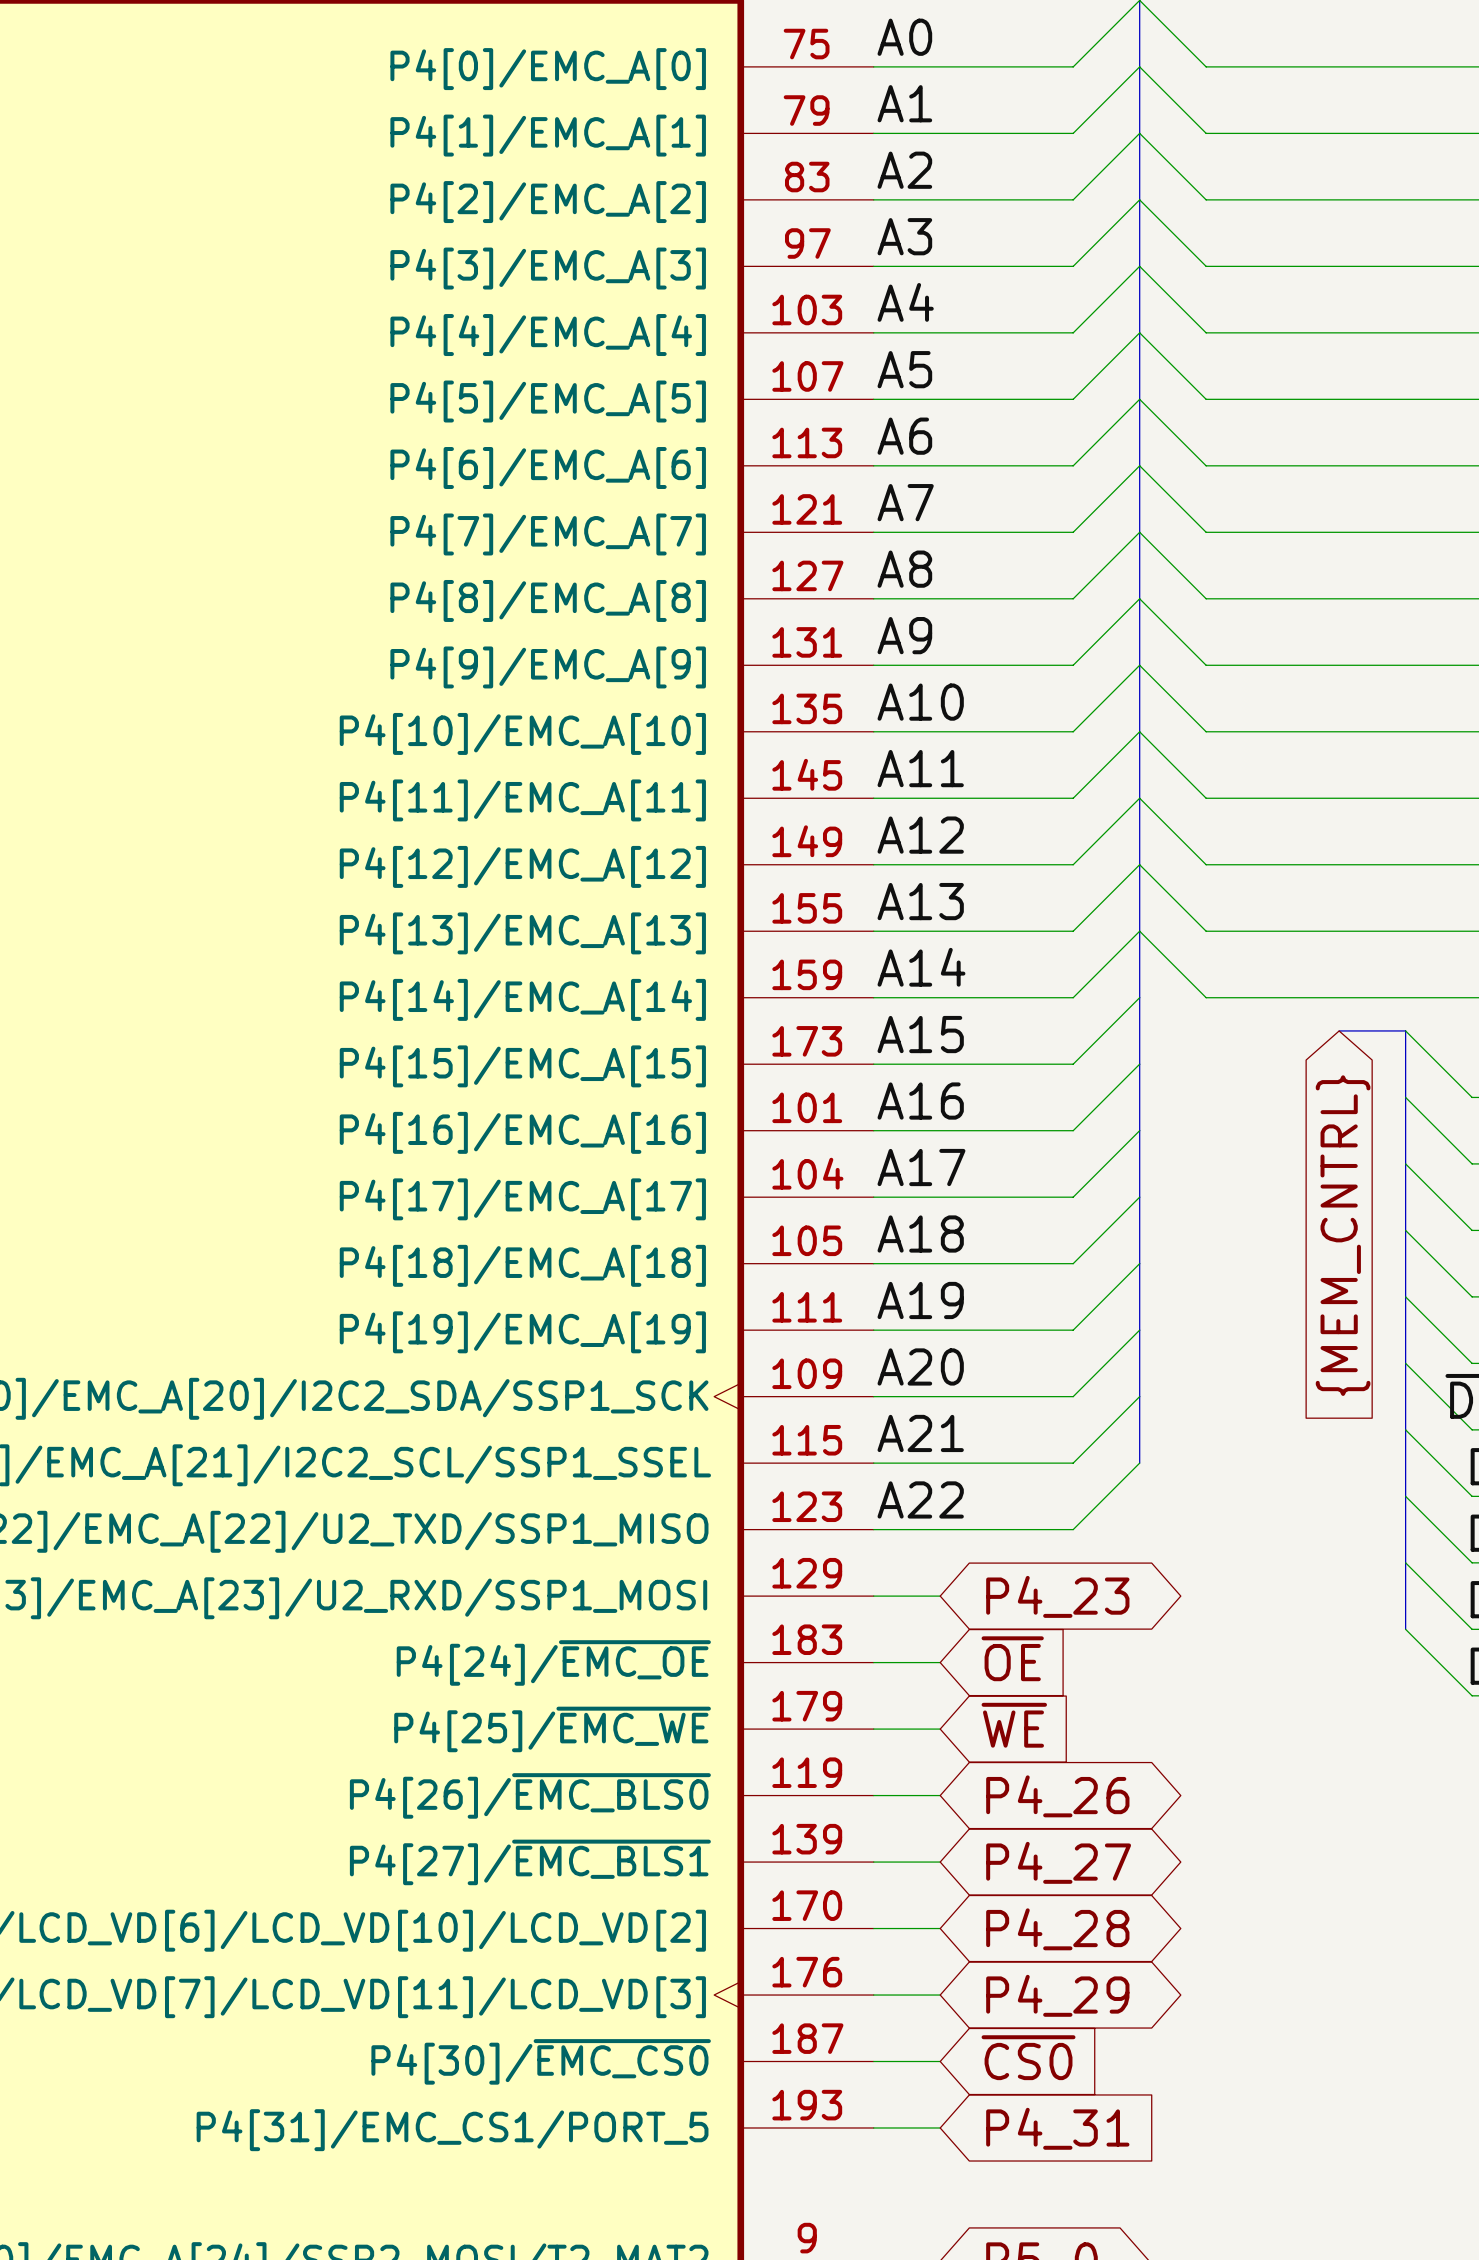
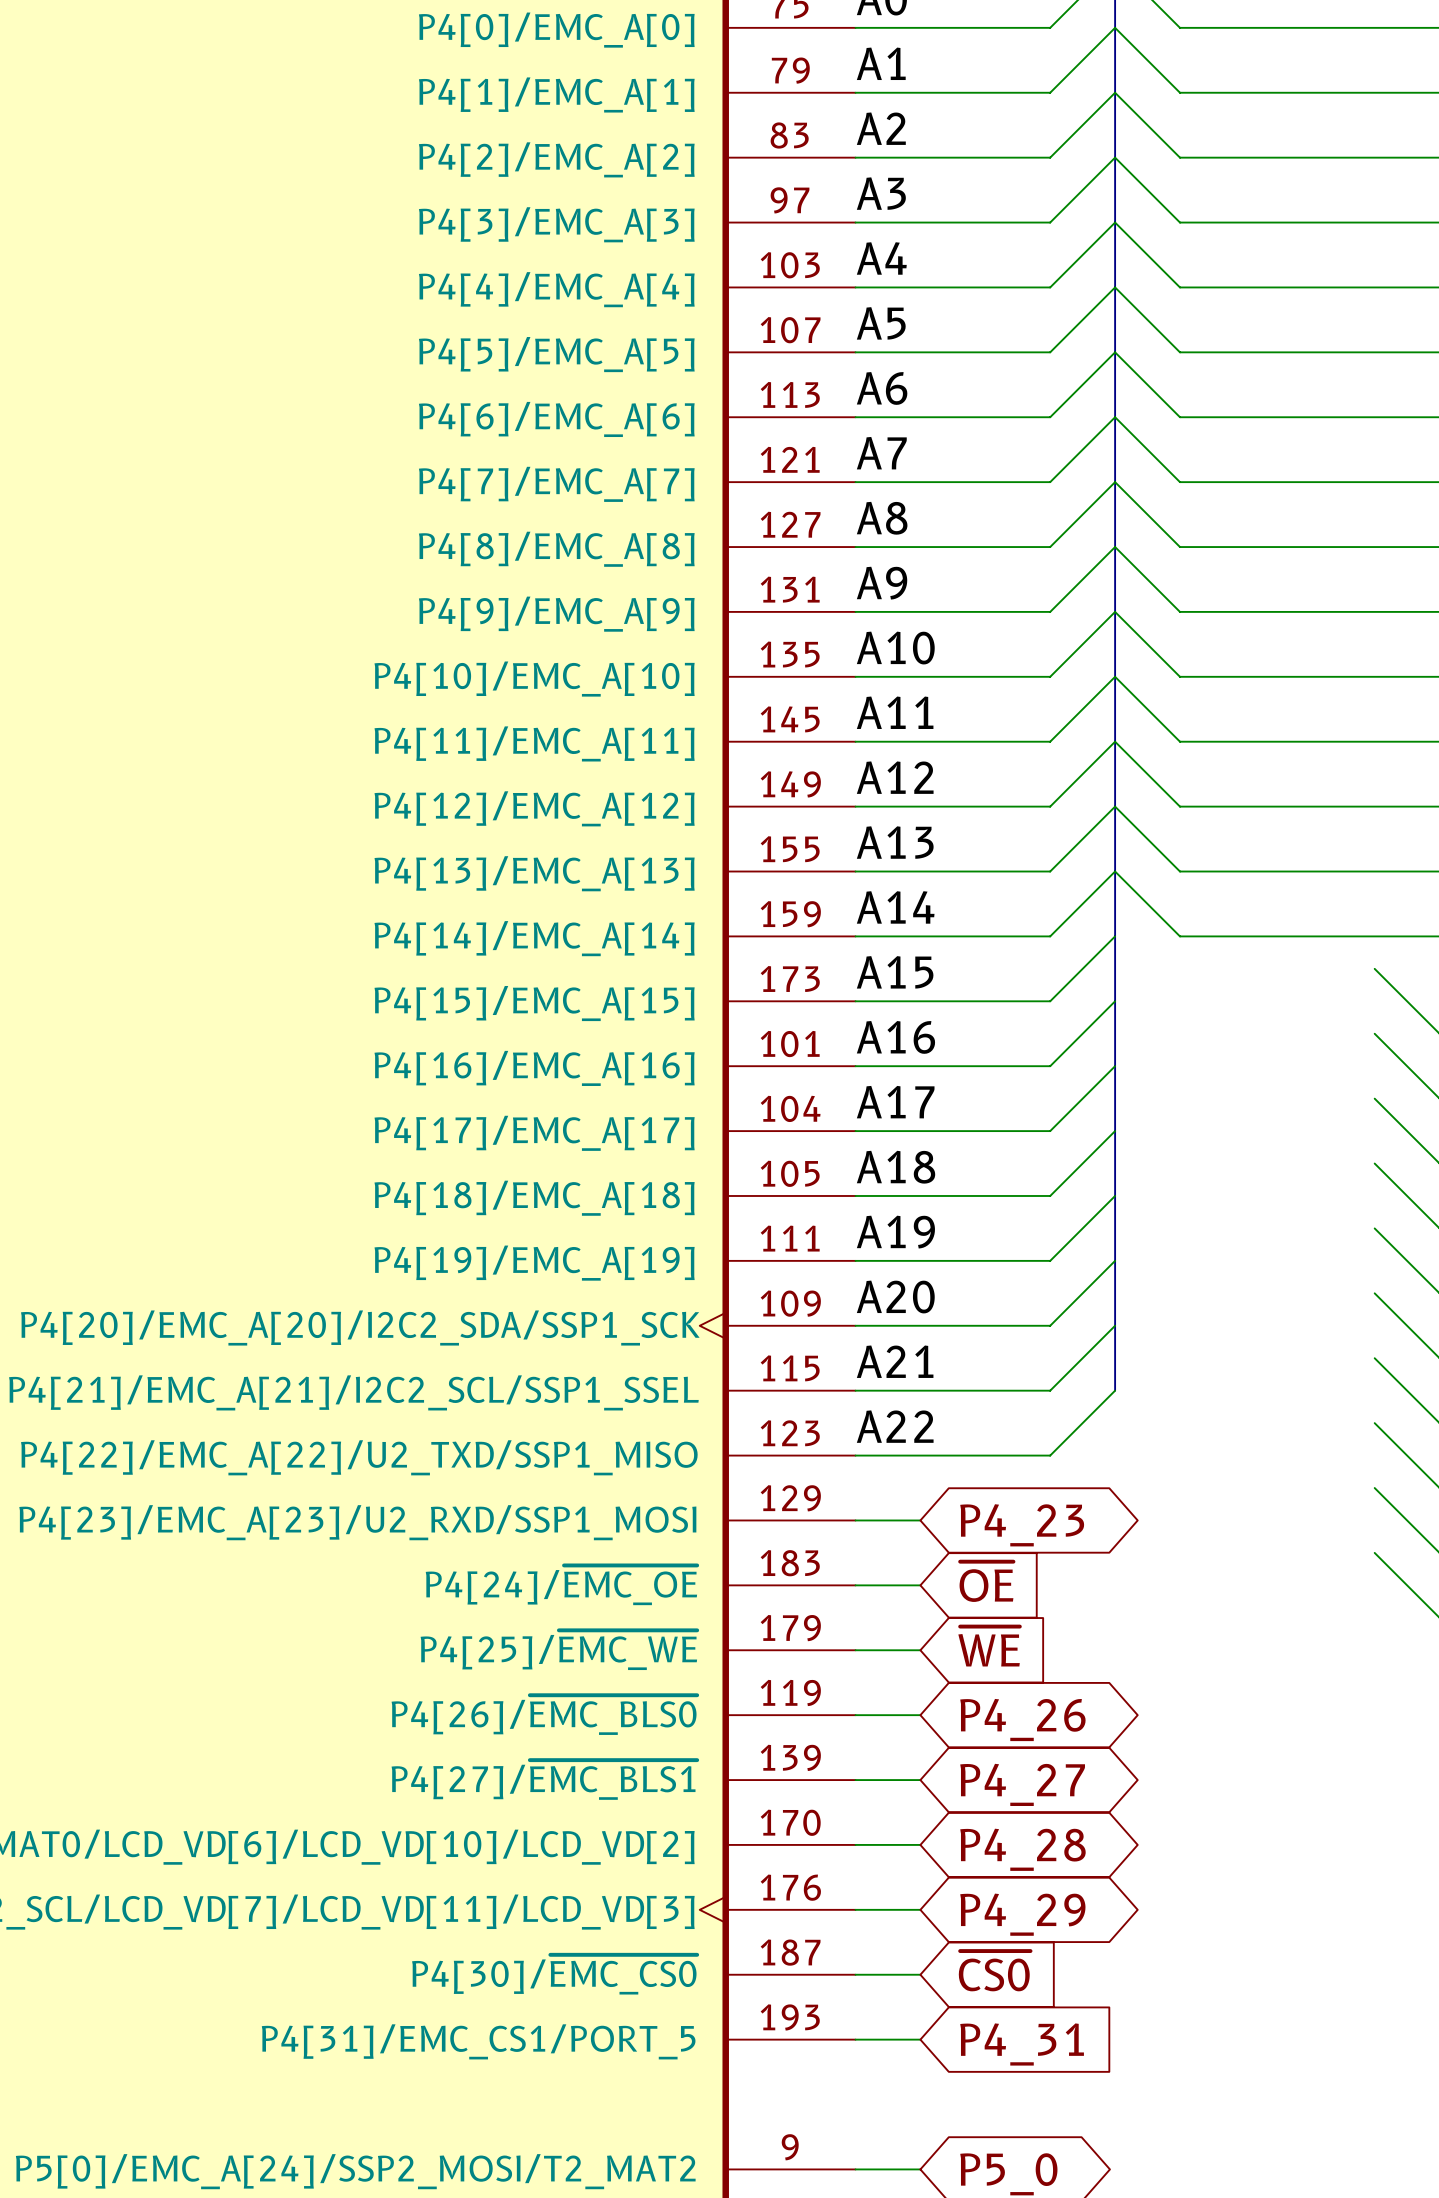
bus: (1339, 1030) (1405, 1030) (1405, 1629) -> none
global label: {MEM_CNTRL} (1343, 1235) -> none

